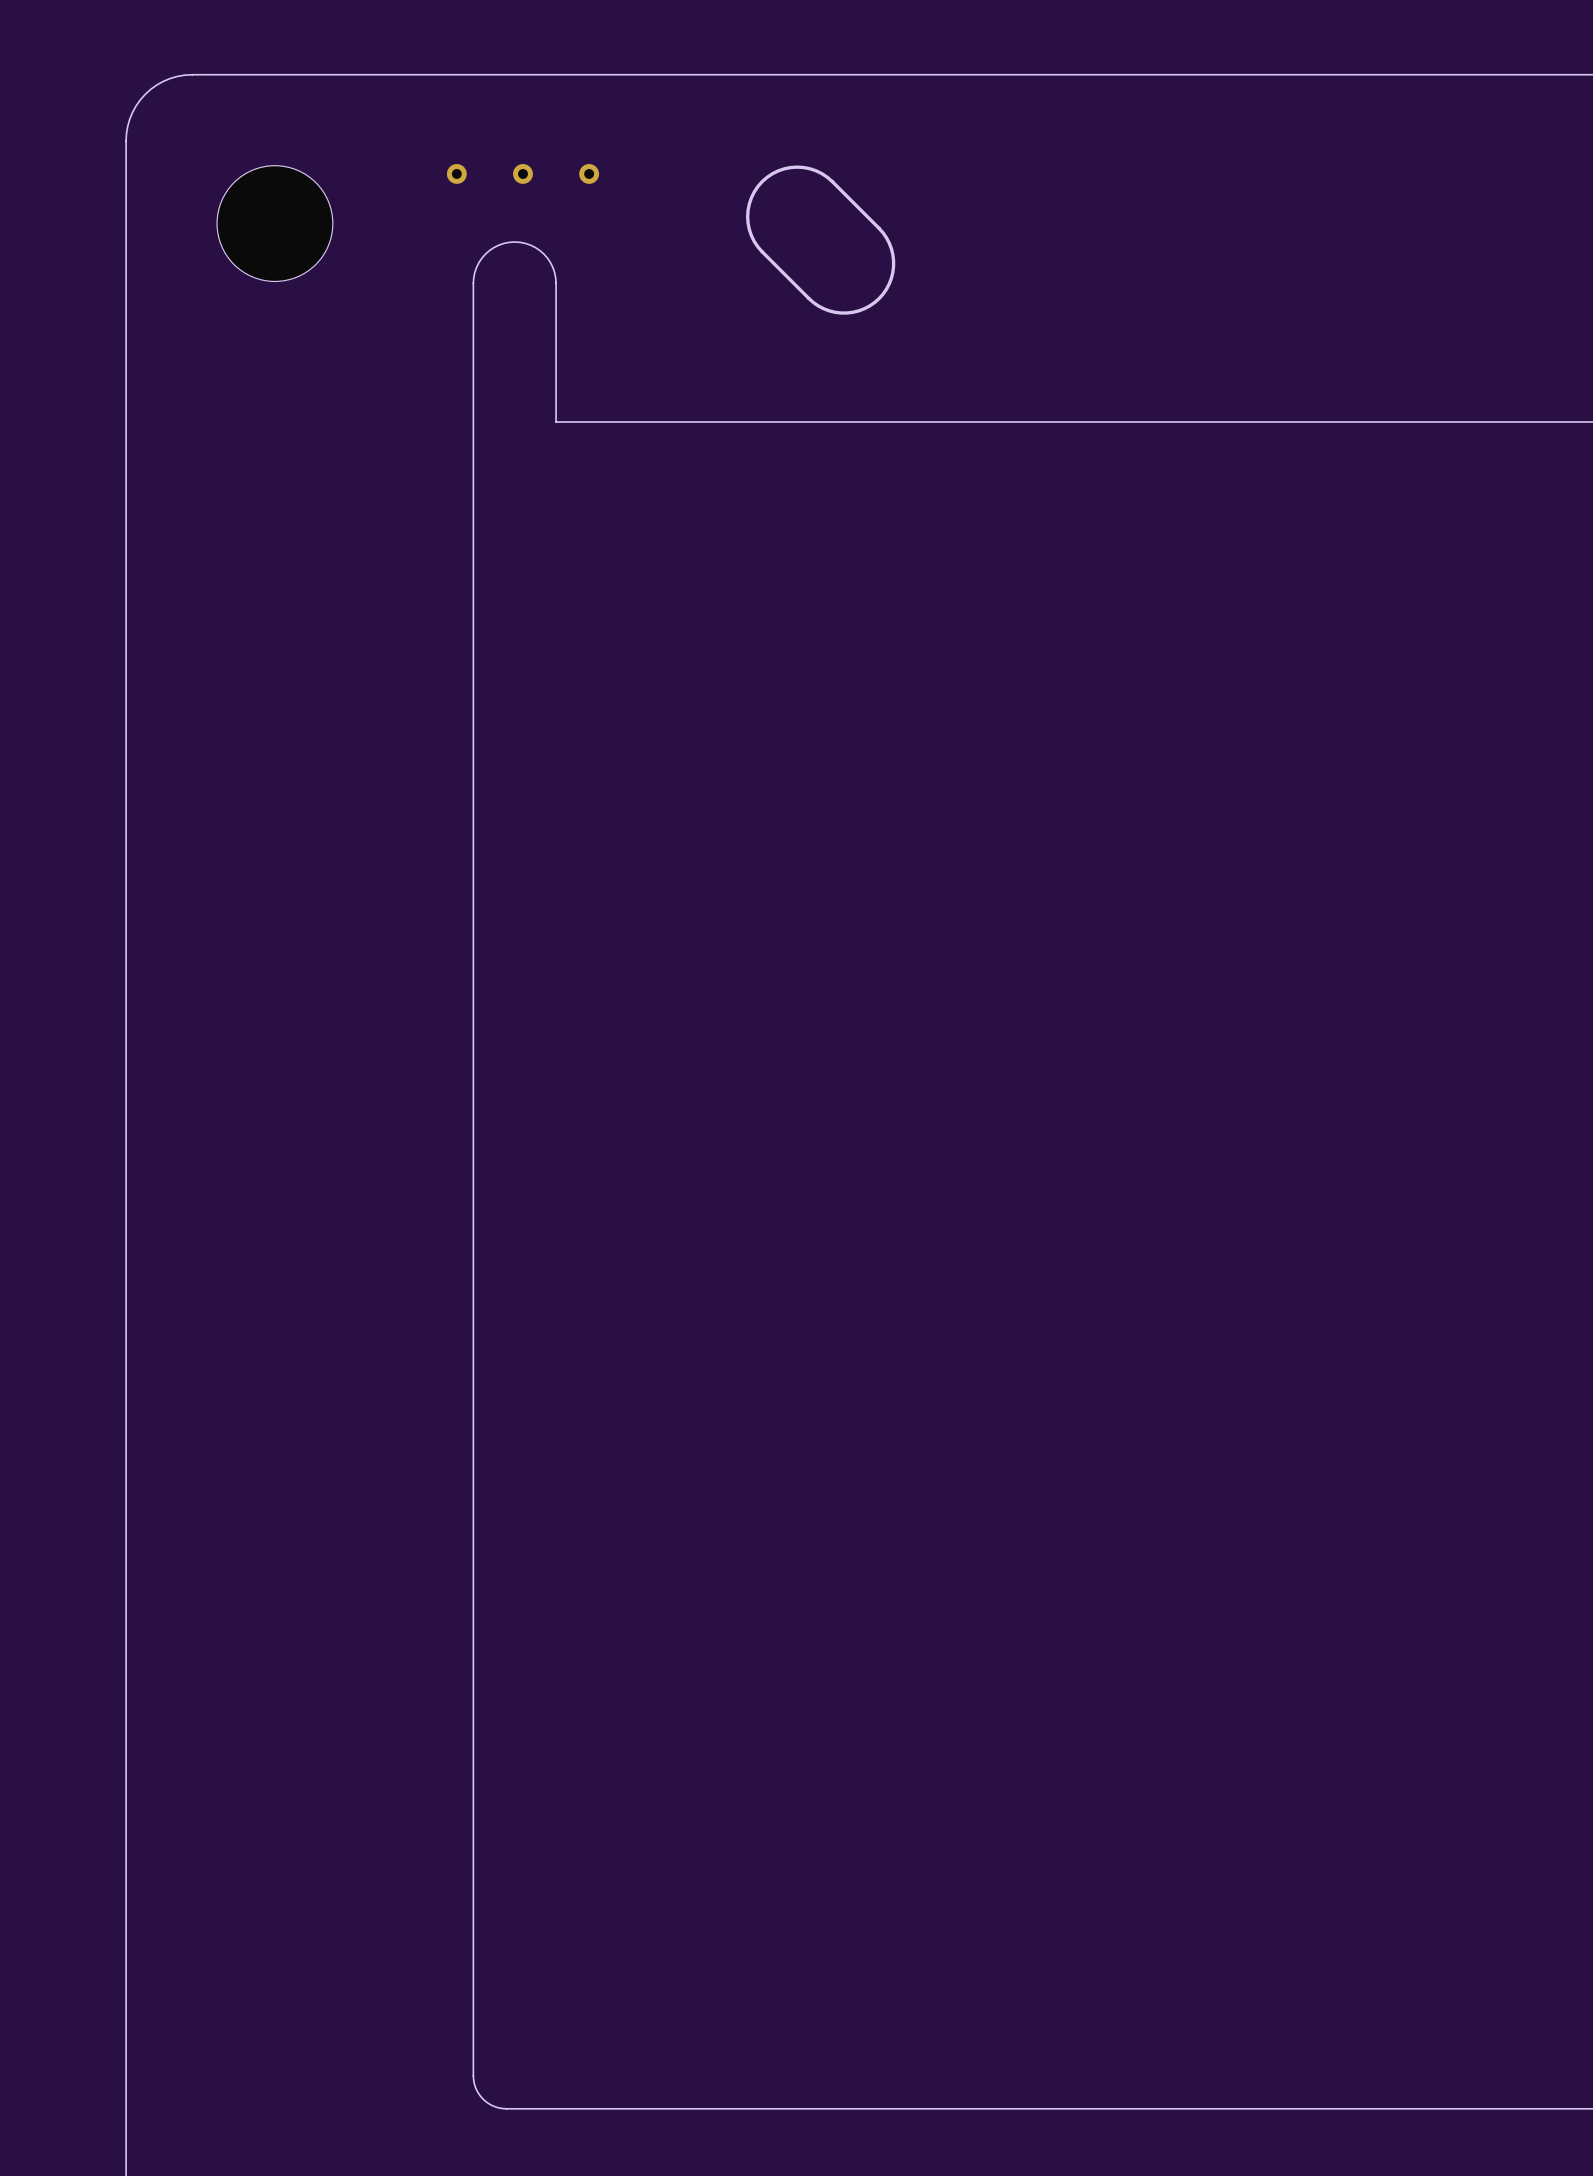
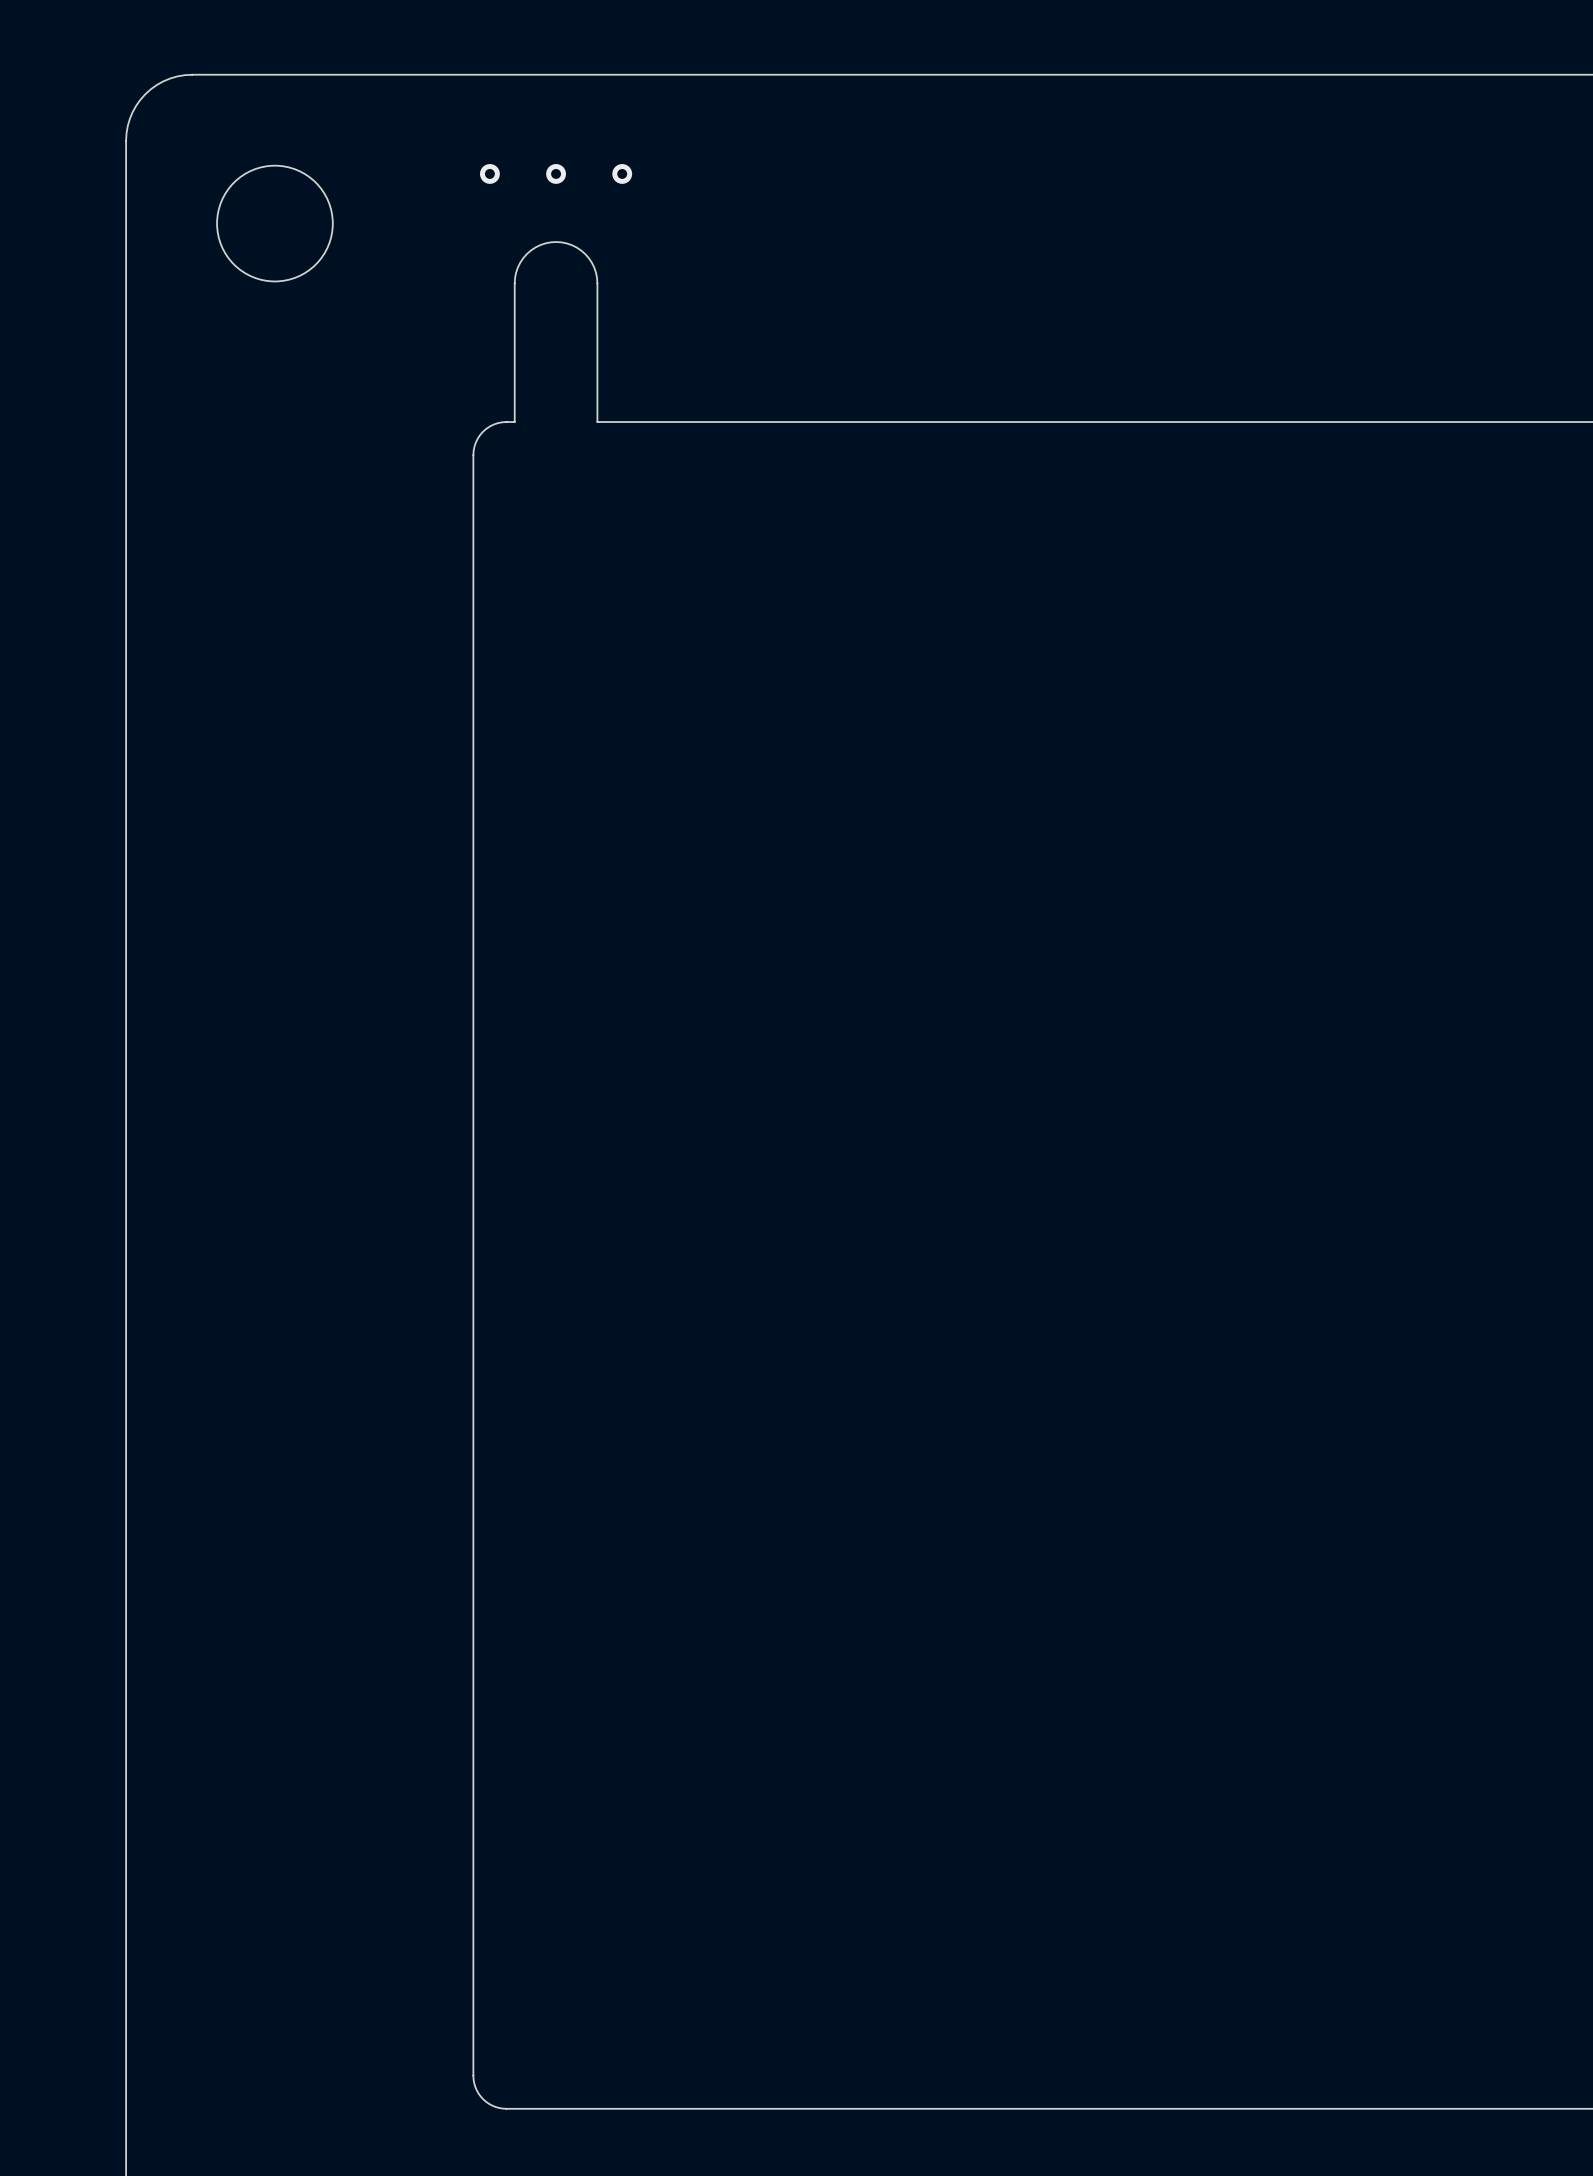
via: (456, 173) -> none
via: none -> (489, 173)
via: (522, 173) -> none
via: none -> (556, 173)
via: (589, 173) -> none
via: none -> (622, 173)
board edge: (832, 181) (883, 232) (892, 254) (892, 272) (886, 289) (874, 302) (852, 312) (835, 312) (813, 302) (757, 246) (751, 235) (748, 223) (748, 210) (754, 191) (762, 181) (778, 170) (797, 167) (810, 168) (822, 173) (832, 181) -> none
board edge: (597, 422) (556, 422) (554, 272) (547, 258) (535, 247) (520, 242) (504, 243) (489, 250) (481, 258) (473, 277) (473, 455) -> (597, 422) (596, 272) (588, 258) (576, 247) (561, 242) (545, 243) (530, 250) (523, 258) (515, 277) (514, 422) (497, 423) (486, 428) (477, 438) (473, 455)

